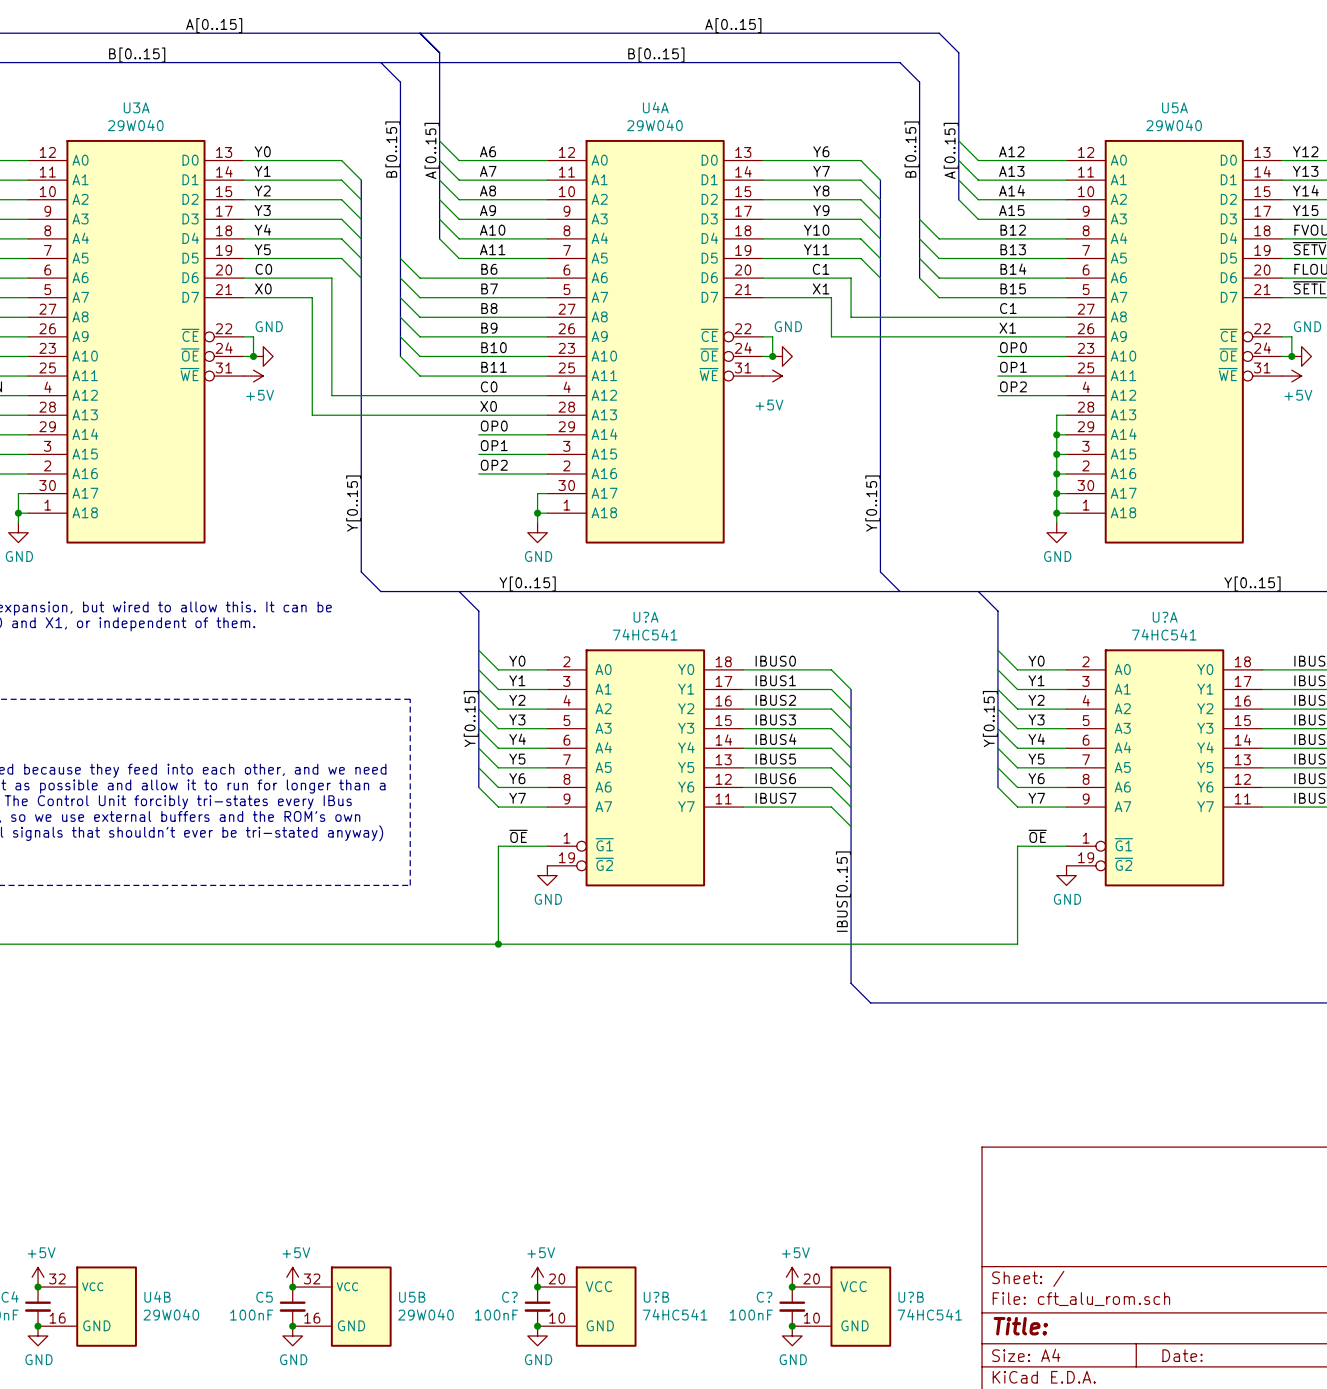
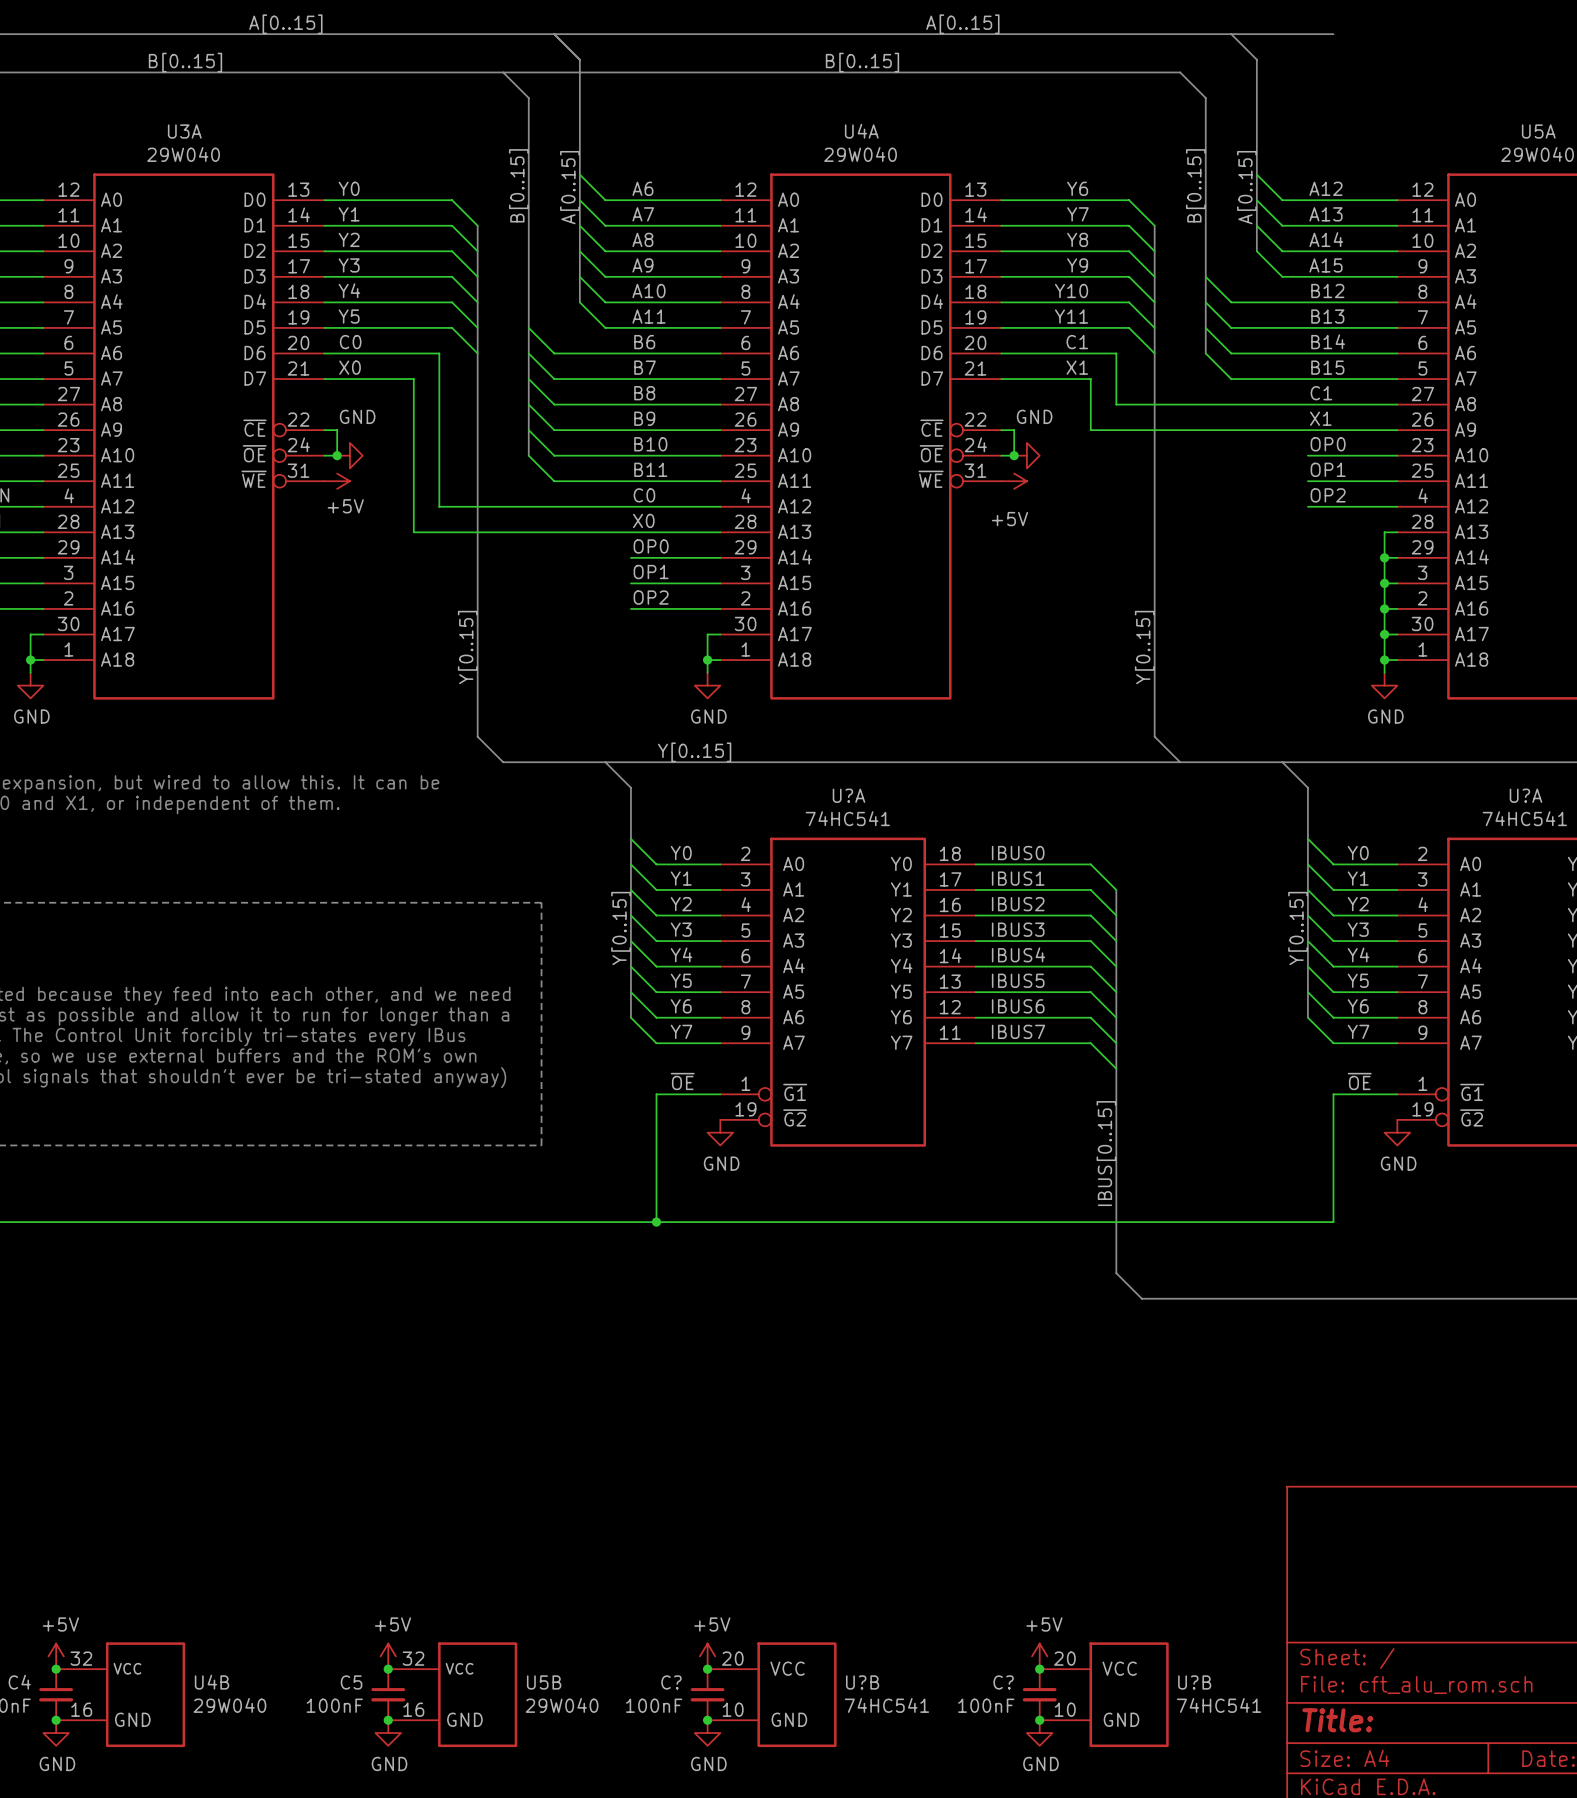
bus: none -> (1231, 34) (1333, 34)

